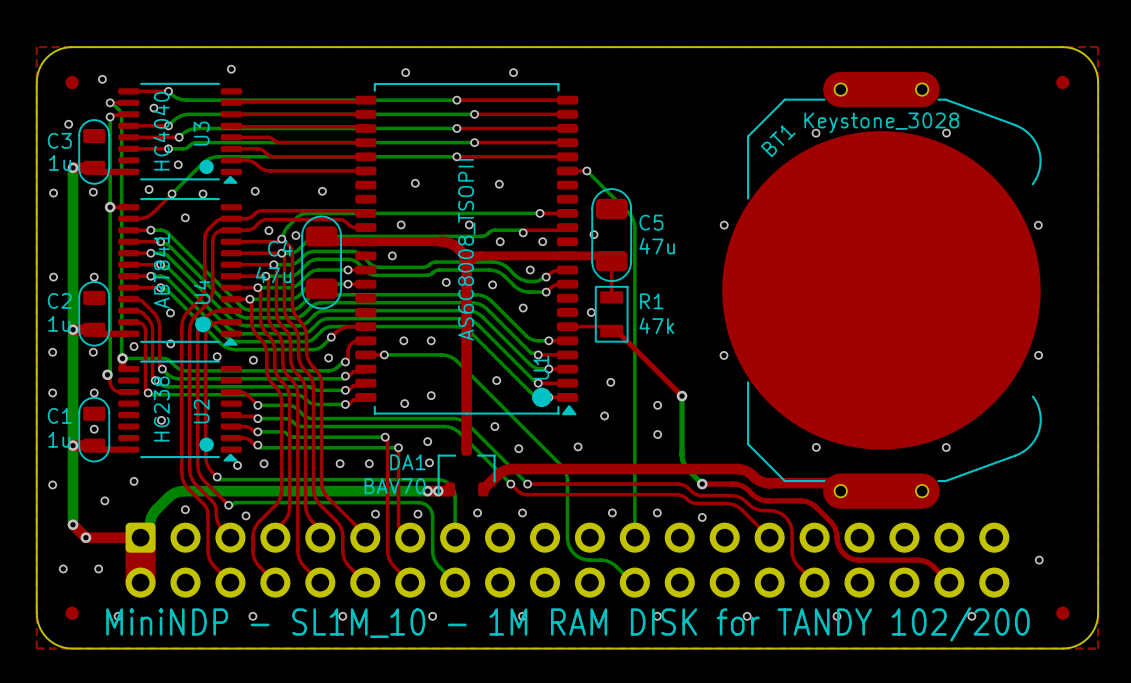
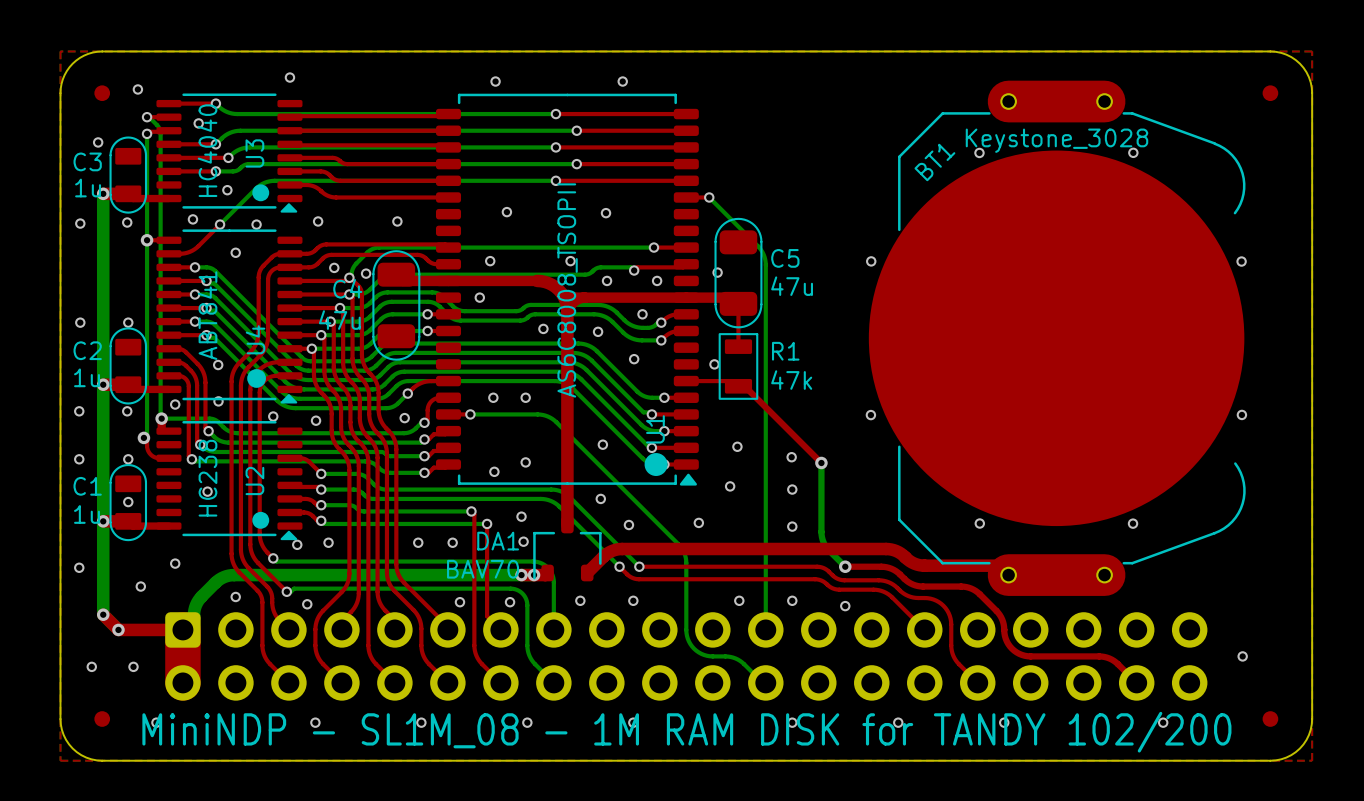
via: none -> (791, 457)
via: (657, 405) -> none
via: none -> (792, 489)
via: (657, 434) -> none
via: none -> (792, 526)
text: MiniNDP - SL1M_10 - 1M RAM DISK for TANDY 102/200 (567, 624) -> MiniNDP - SL1M_08 - 1M RAM DISK for TANDY 102/200 (686, 732)

